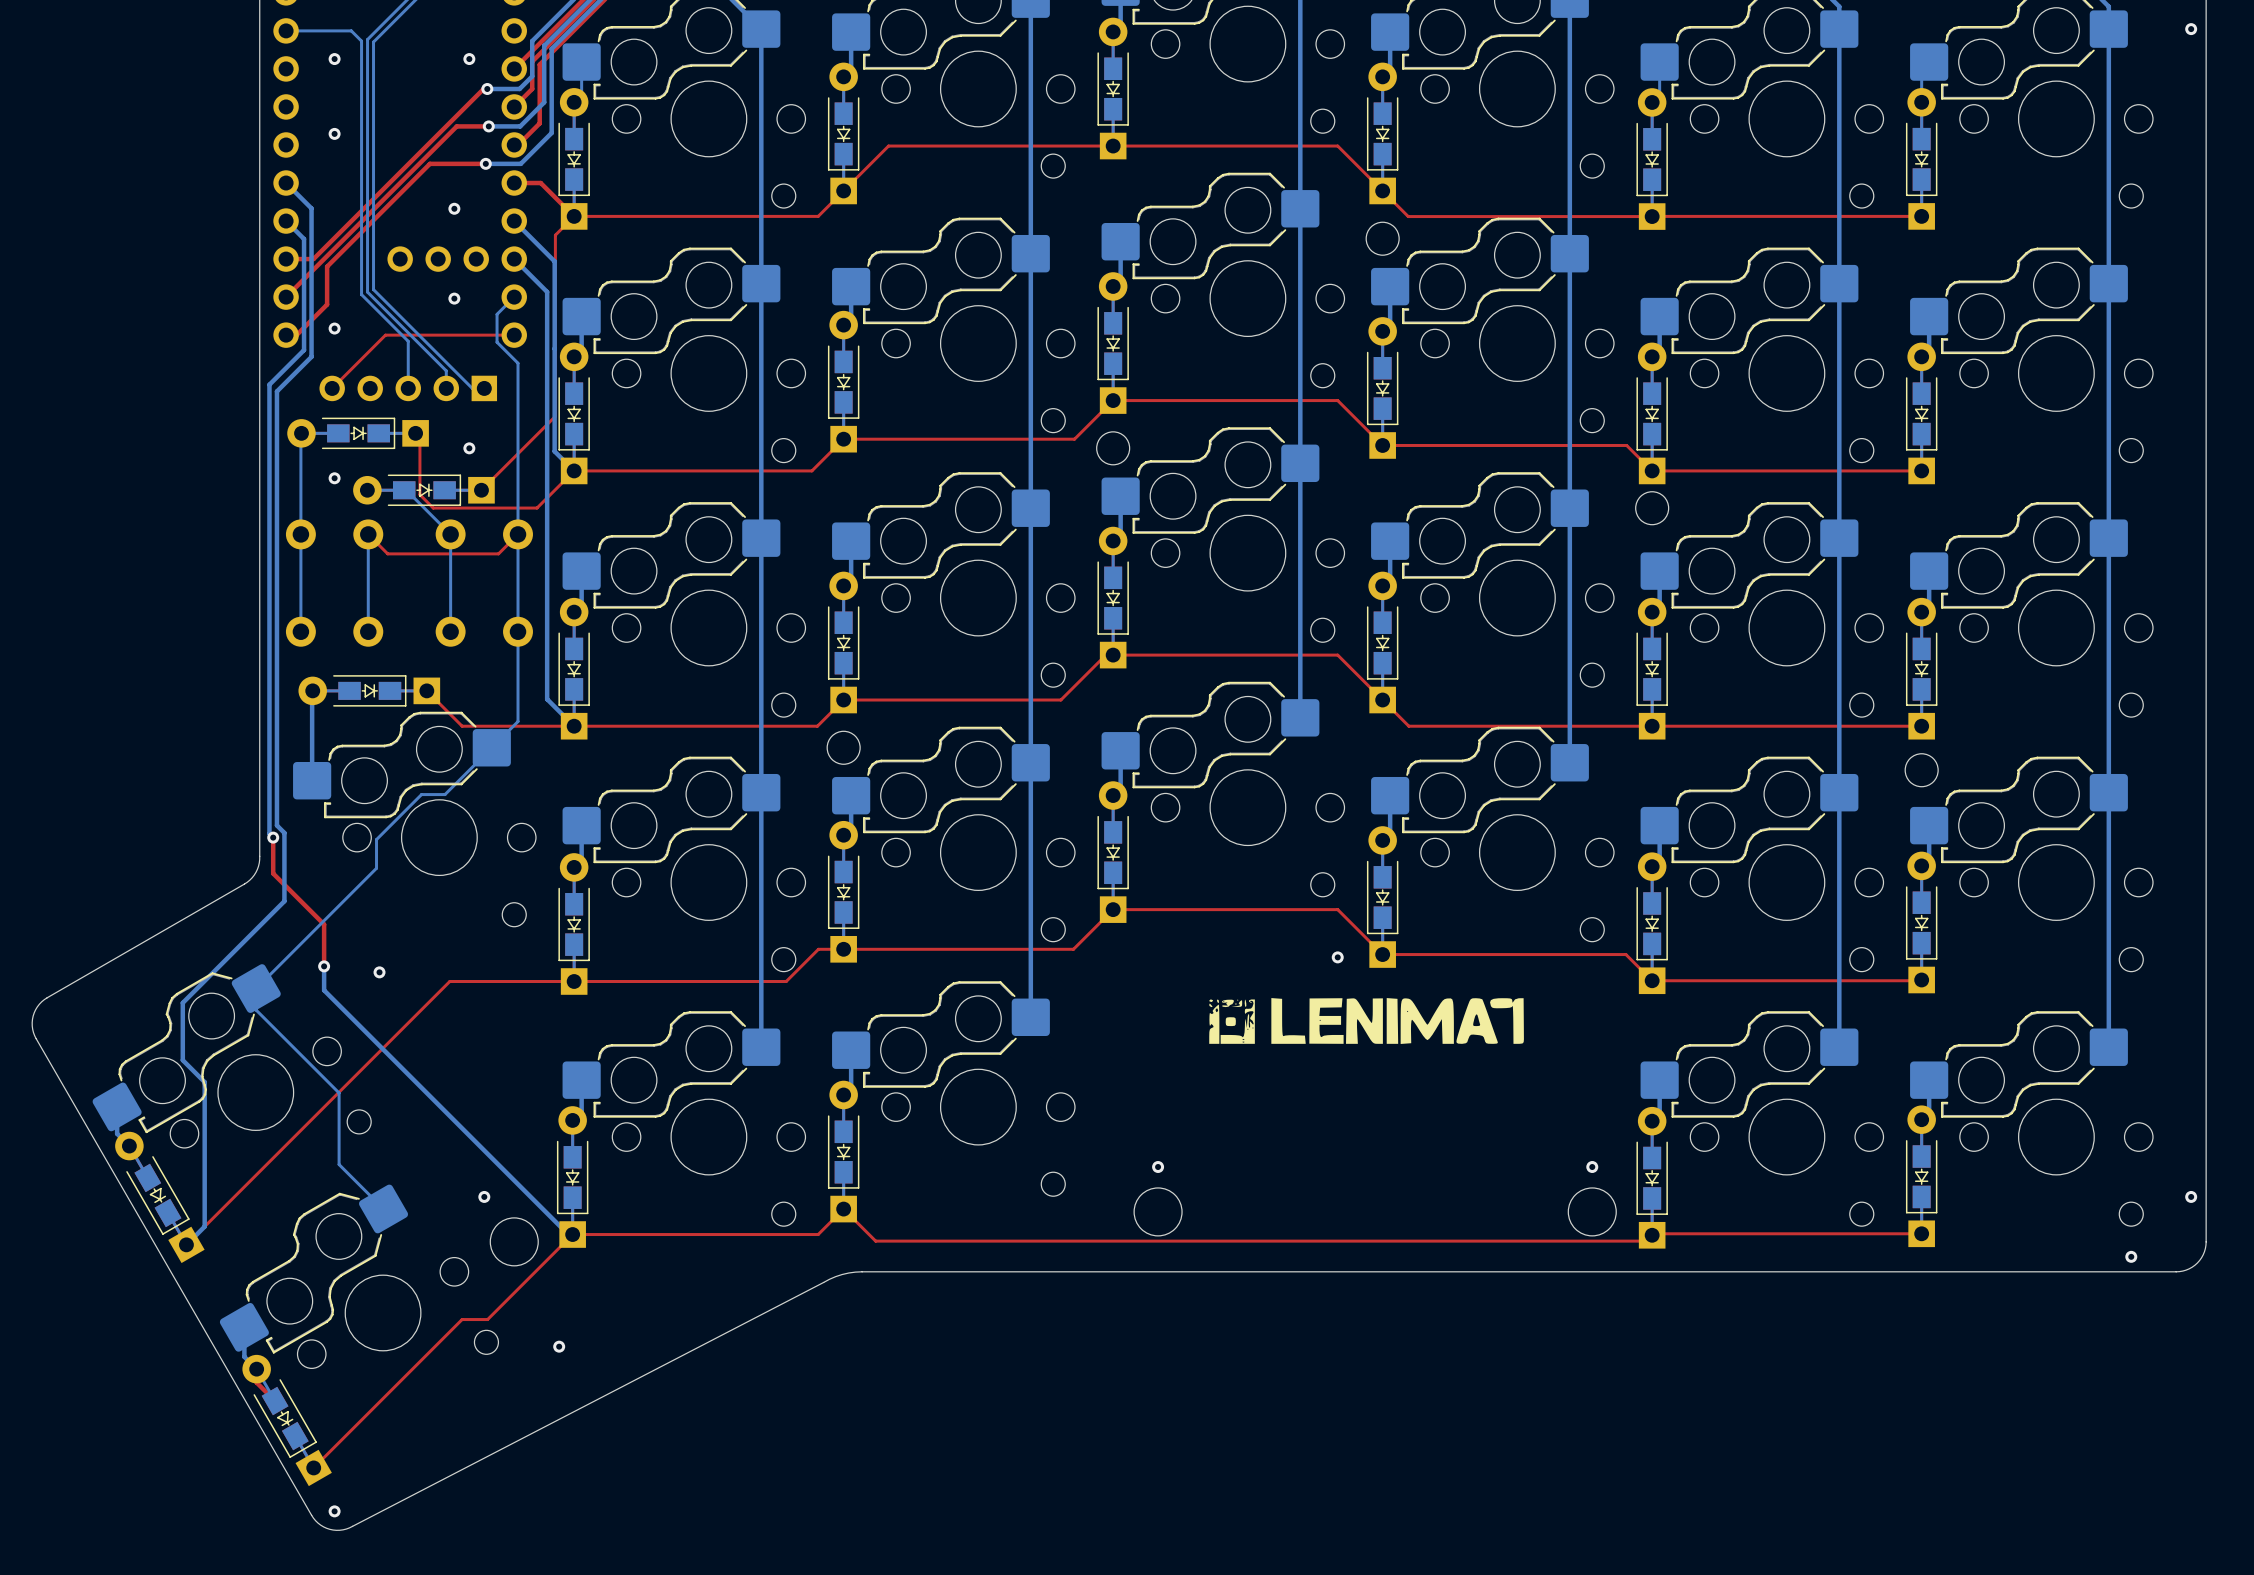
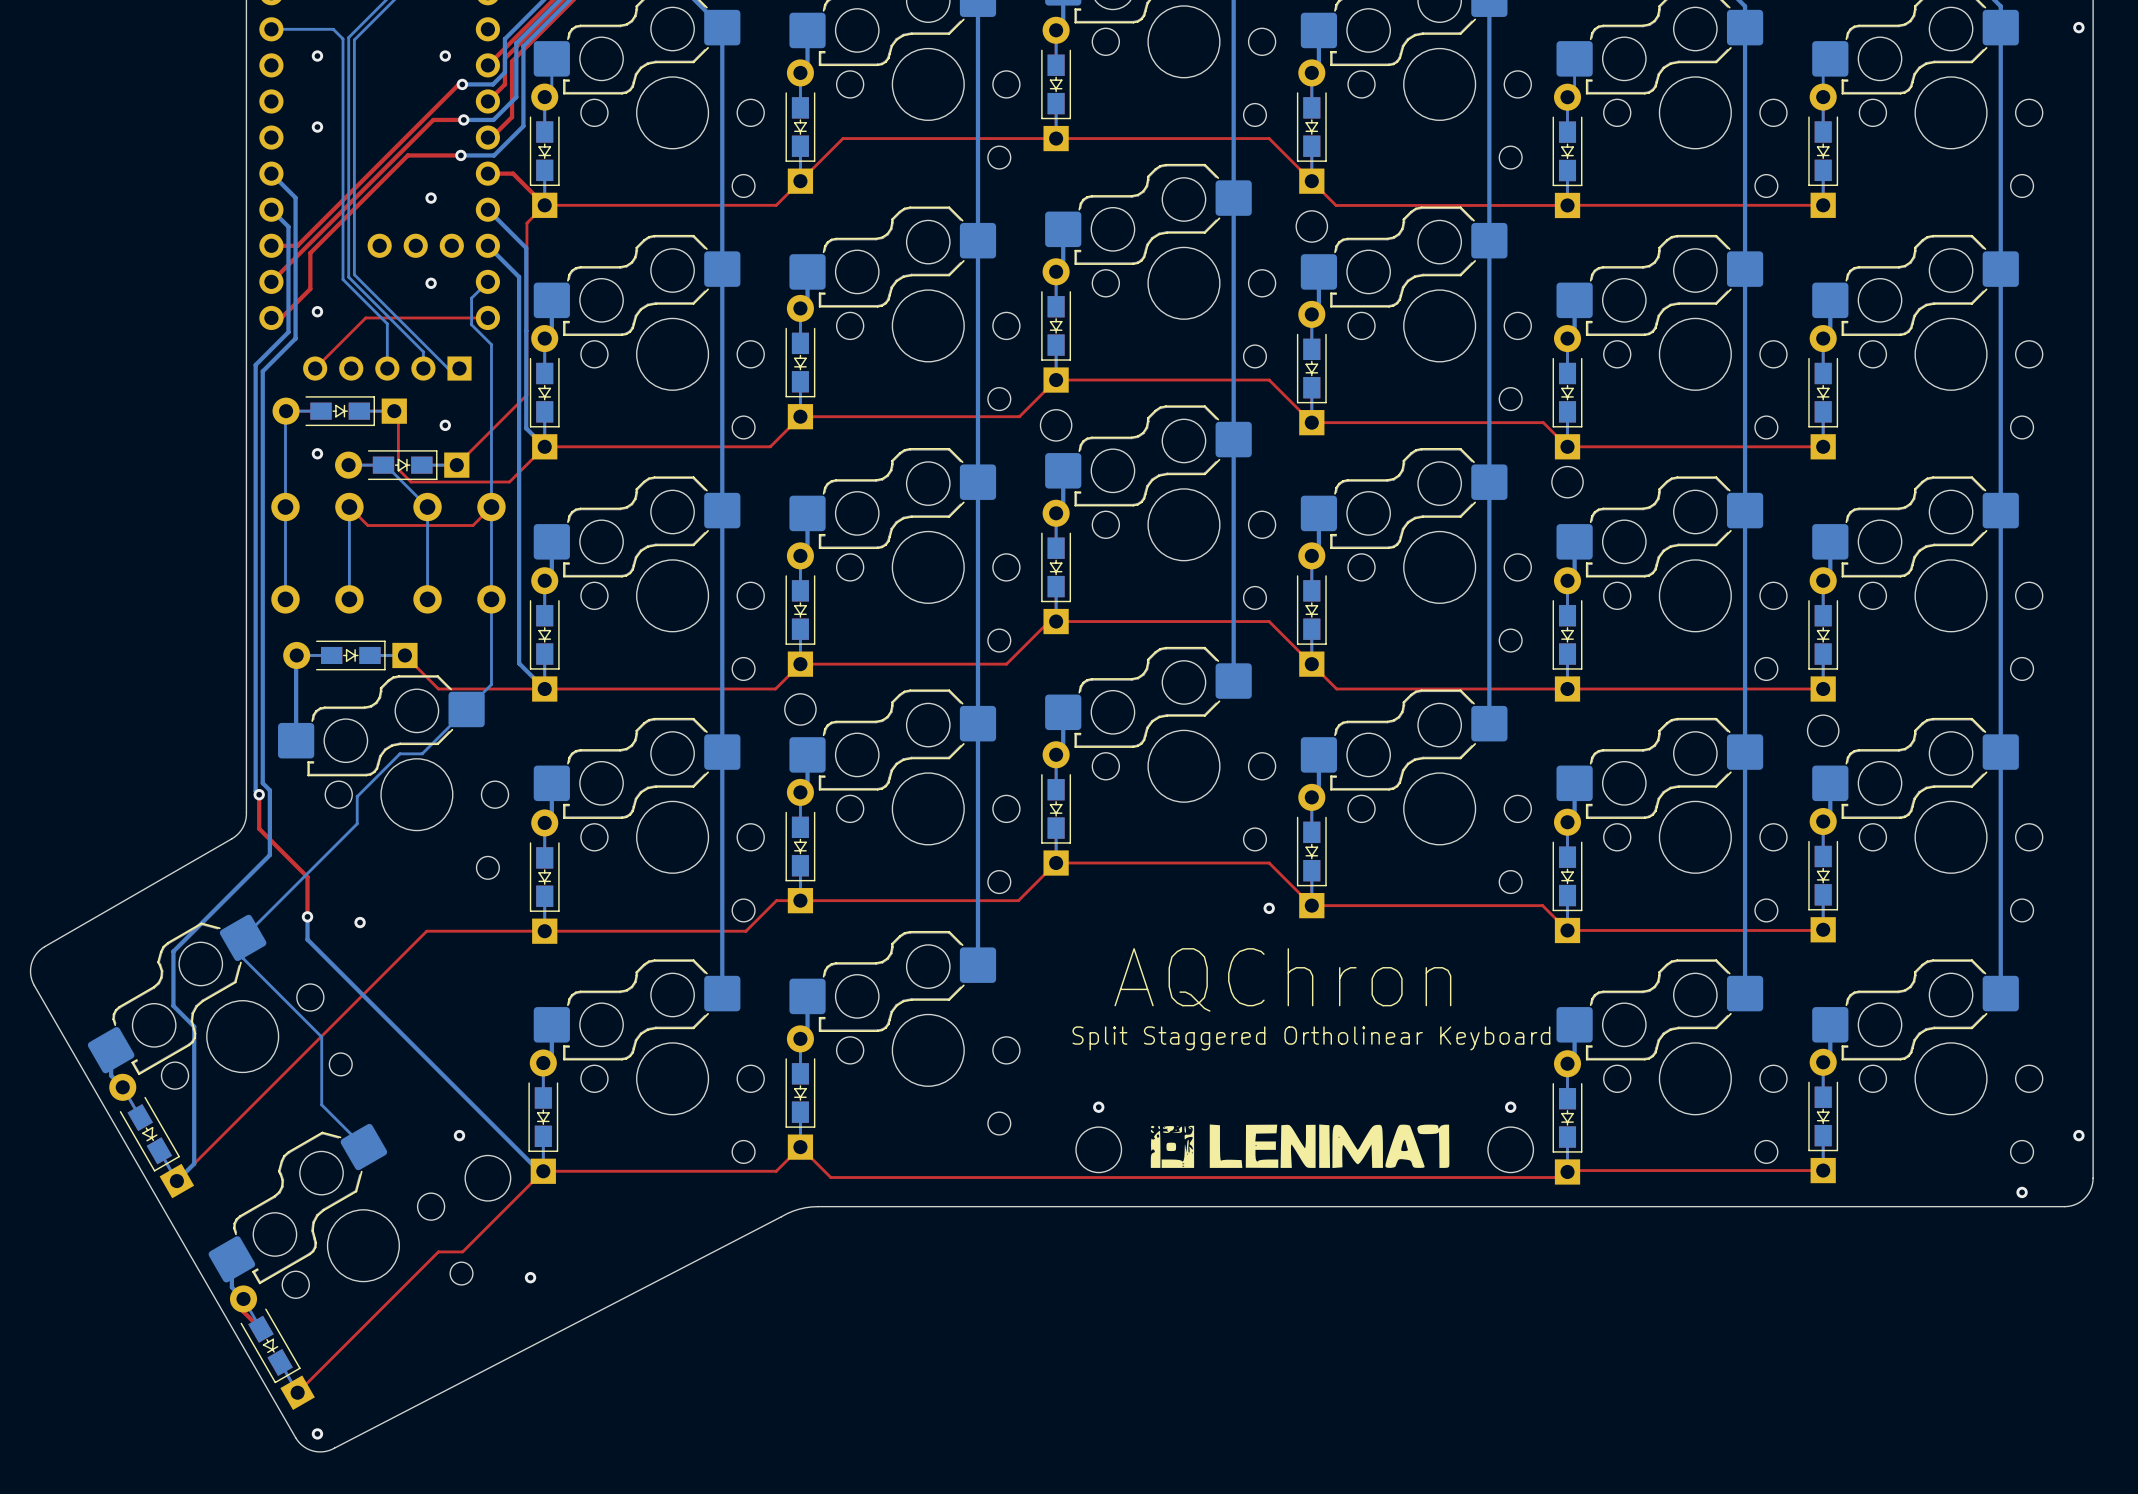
drawing position: (1366, 1021) -> (1300, 1146)
text: none -> AQChron (1282, 979)
text: none -> Split Staggered Ortholinear Keyboard (1311, 1038)

